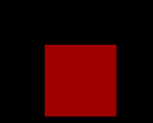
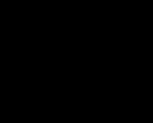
part: (80, 80) -> none

